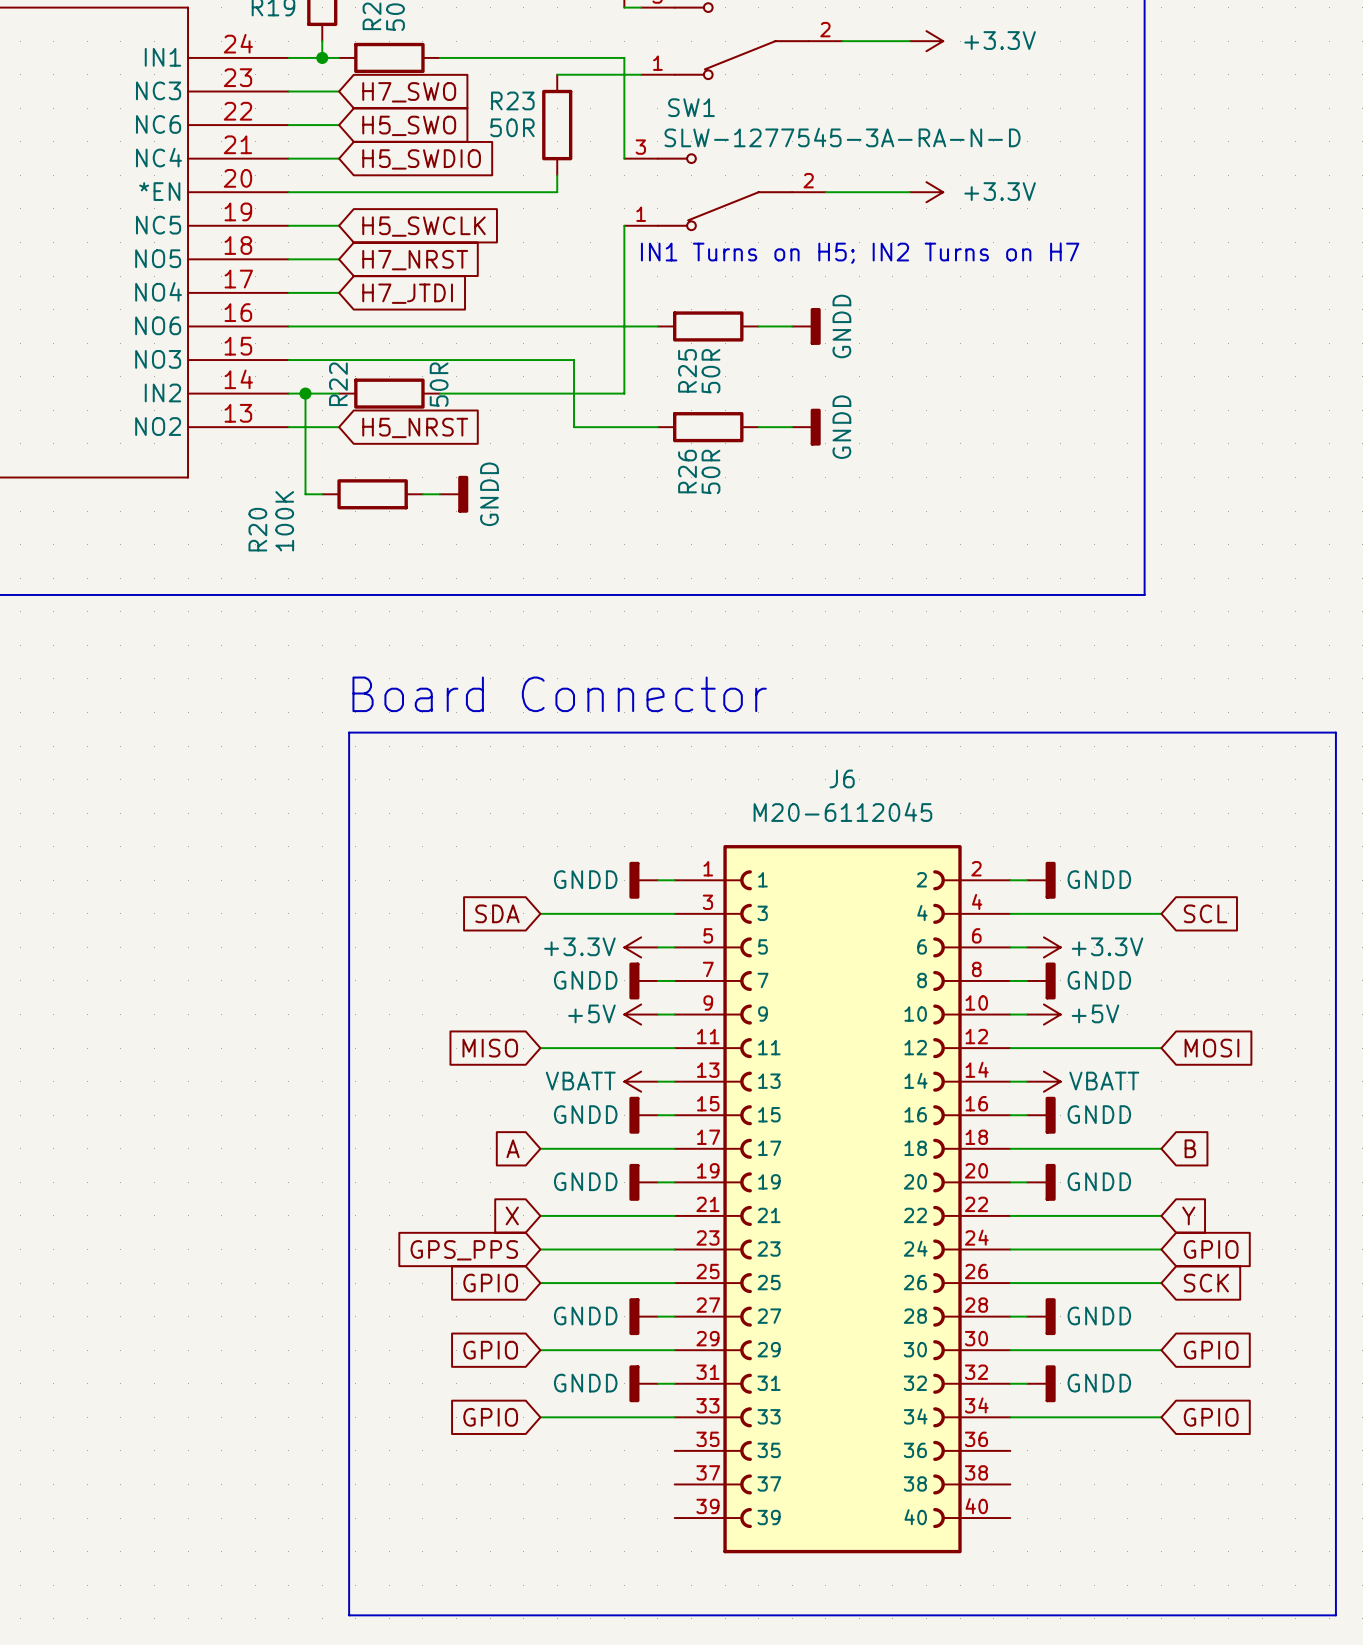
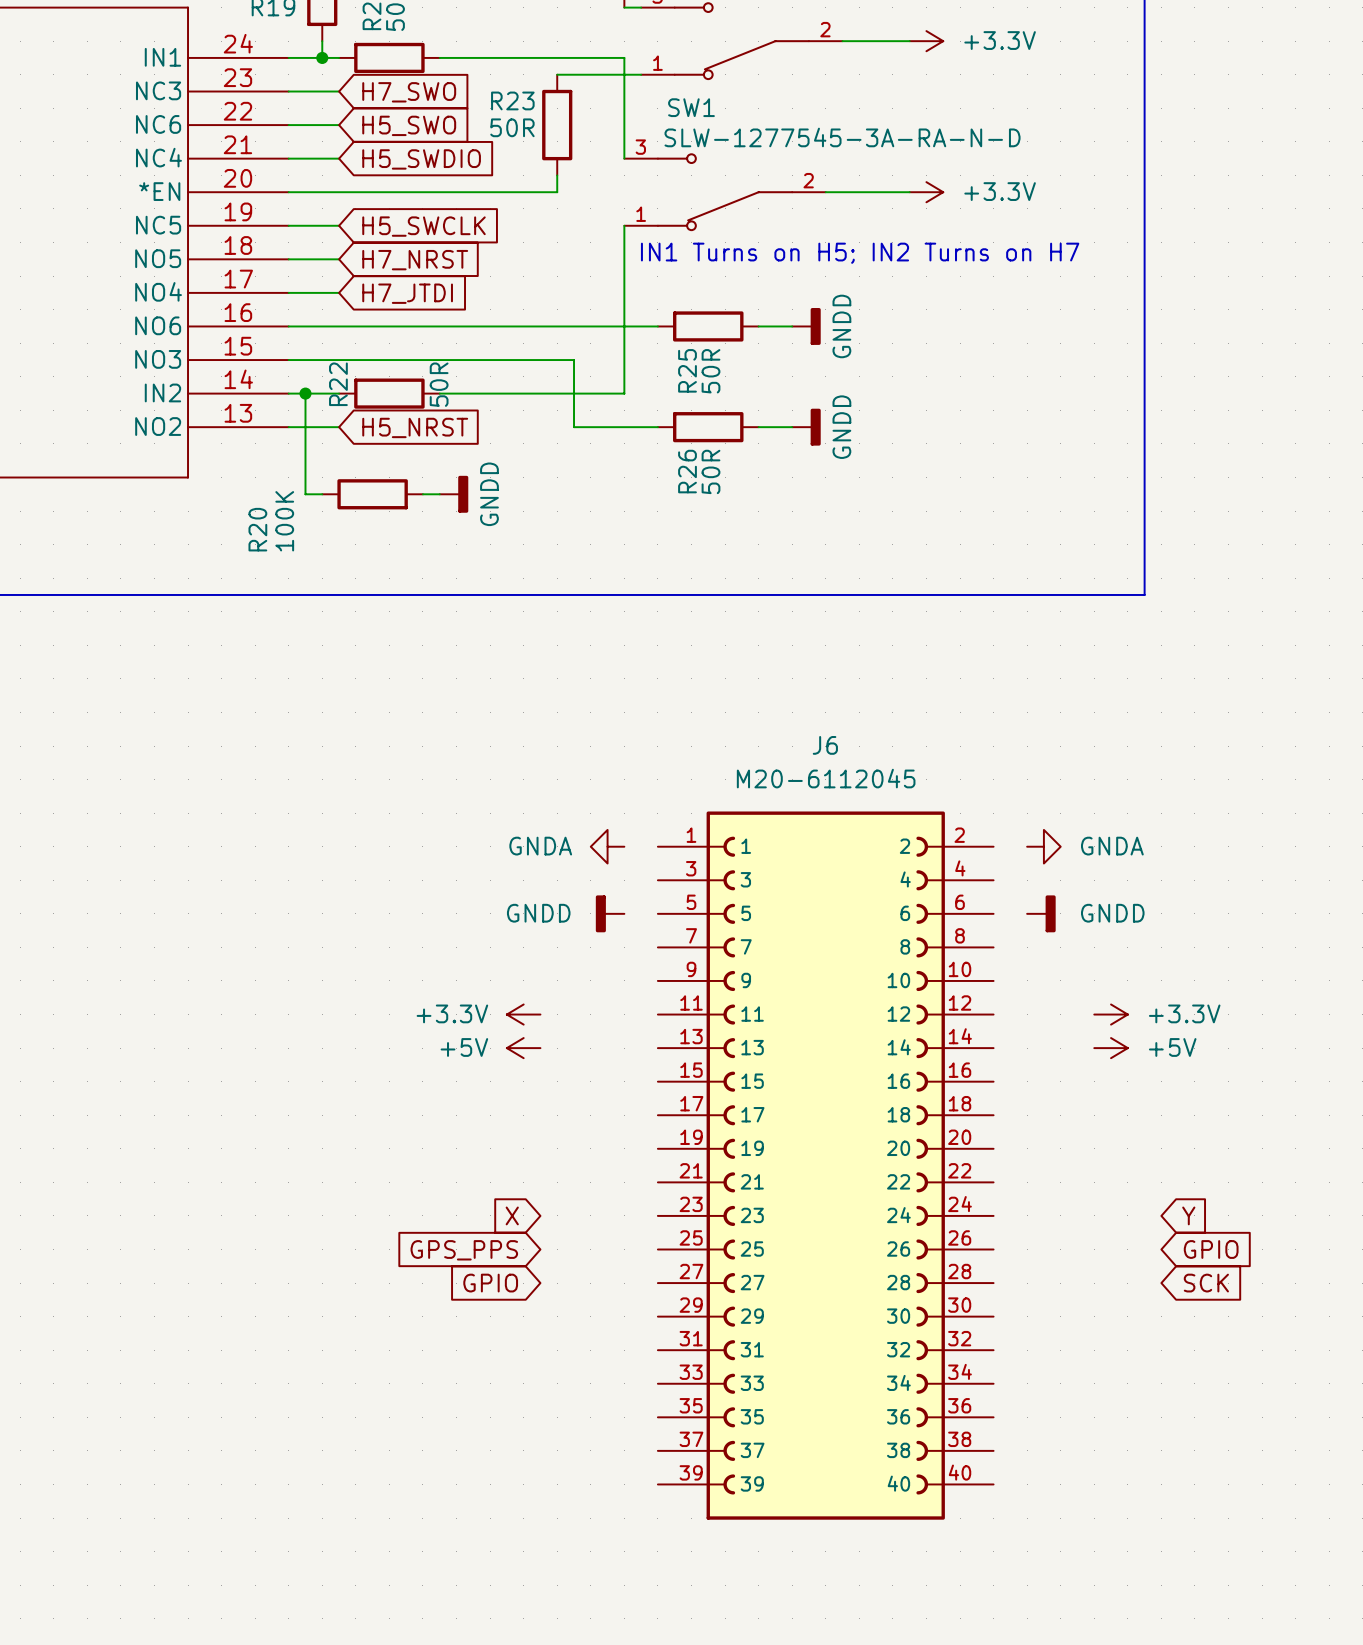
text: Board Connector (559, 694) -> none
line: (349, 732) (1335, 732) (1335, 1615) (349, 1615) (349, 732) -> none
power symbol: none -> GNDA (607, 846)
power symbol: none -> GNDA (1043, 846)
power symbol: GNDD (643, 880) -> none
wire: (1010, 880) (1027, 880) -> none
power symbol: GNDD (1041, 880) -> none
global label: SDA (497, 913) -> none
wire: (540, 913) (674, 913) -> none
power symbol: none -> GNDD (610, 913)
wire: (1010, 913) (1161, 913) -> none
power symbol: none -> GNDD (1041, 913)
global label: SCL (1205, 913) -> none
power symbol text position: +3.3V (579, 946) -> +3.3V (452, 1013)
power symbol text position: +3.3V (1107, 946) -> +3.3V (1184, 1013)
power symbol position: +3.3V (641, 947) -> +3.3V (523, 1014)
wire: (1010, 947) (1027, 947) -> none
power symbol position: +3.3V (1043, 947) -> +3.3V (1111, 1014)
power symbol: GNDD (643, 980) -> none
wire: (1010, 980) (1027, 980) -> none
power symbol: GNDD (1041, 980) -> none
power symbol text position: +5V (591, 1013) -> +5V (464, 1047)
power symbol text position: +5V (1095, 1013) -> +5V (1172, 1047)
power symbol position: +5V (641, 1014) -> +5V (523, 1048)
wire: (1010, 1014) (1027, 1014) -> none
power symbol position: +5V (1043, 1014) -> +5V (1111, 1048)
global label: MISO (490, 1048) -> none
wire: (540, 1048) (674, 1048) -> none
wire: (1010, 1048) (1161, 1048) -> none
global label: MOSI (1211, 1048) -> none
power symbol: VBATT (641, 1081) -> none
wire: (1010, 1081) (1027, 1081) -> none
power symbol: VBATT (1043, 1081) -> none
power symbol: GNDD (643, 1115) -> none
wire: (1010, 1115) (1027, 1115) -> none
power symbol: GNDD (1041, 1115) -> none
global label: A (513, 1148) -> none
wire: (540, 1148) (674, 1148) -> none
wire: (1010, 1148) (1161, 1148) -> none
global label: B (1190, 1148) -> none
power symbol: GNDD (643, 1182) -> none
wire: (1010, 1182) (1027, 1182) -> none
power symbol: GNDD (1041, 1182) -> none
J6 position: (842, 1199) -> (825, 1165)
wire: (540, 1215) (674, 1215) -> none
wire: (1010, 1215) (1161, 1215) -> none
wire: (540, 1249) (674, 1249) -> none
wire: (1010, 1249) (1161, 1249) -> none
wire: (540, 1283) (674, 1283) -> none
wire: (1010, 1283) (1161, 1283) -> none
power symbol: GNDD (643, 1316) -> none
wire: (1010, 1316) (1027, 1316) -> none
power symbol: GNDD (1041, 1316) -> none
global label: GPIO (490, 1350) -> none
wire: (540, 1350) (674, 1350) -> none
wire: (1010, 1350) (1161, 1350) -> none
global label: GPIO (1211, 1350) -> none
power symbol: GNDD (643, 1383) -> none
wire: (1010, 1383) (1027, 1383) -> none
power symbol: GNDD (1041, 1383) -> none
global label: GPIO (490, 1417) -> none
wire: (540, 1417) (674, 1417) -> none
wire: (1010, 1417) (1161, 1417) -> none
global label: GPIO (1211, 1417) -> none

